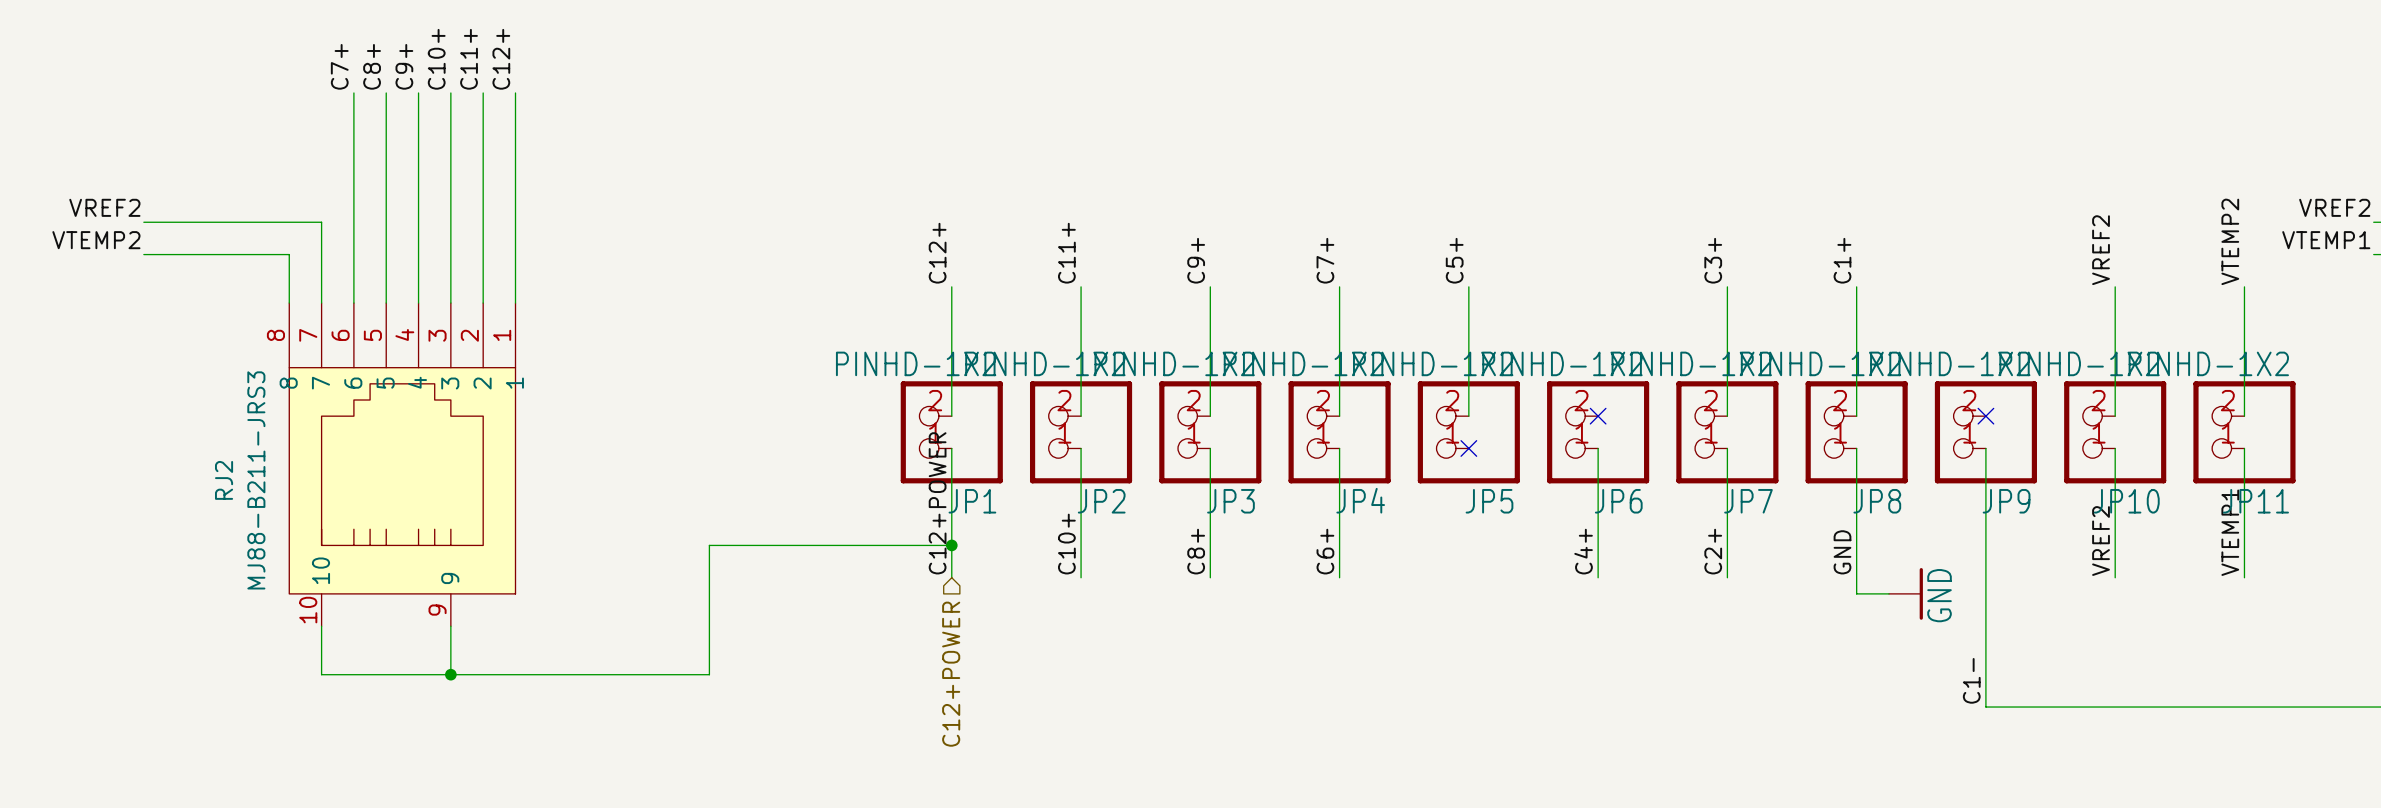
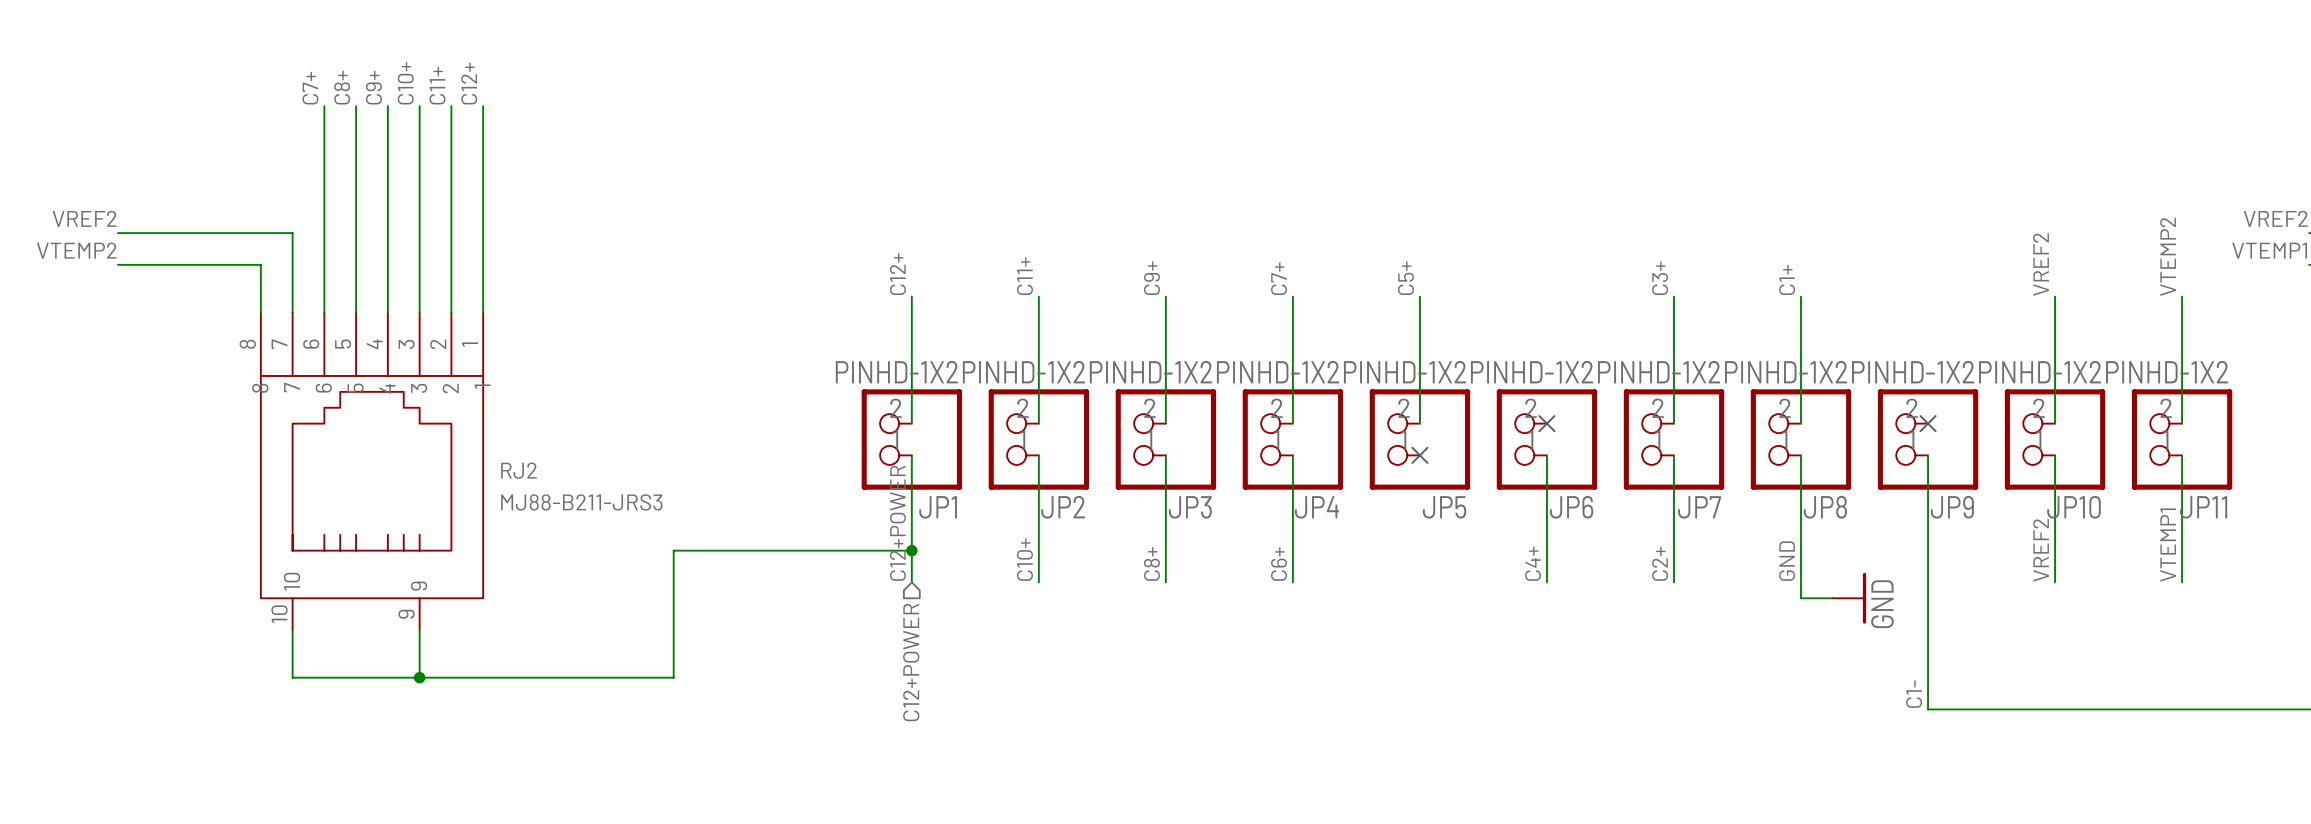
RJ2 name rotation: 0° (224, 480) -> 90° clockwise (519, 470)
RJ2 name position: RJ2 (224, 480) -> RJ2 (519, 470)
RJ2 value rotation: 0° (256, 480) -> 90° clockwise (581, 502)
RJ2 value position: MJ88-B211-JRS3 (256, 480) -> MJ88-B211-JRS3 (581, 502)

